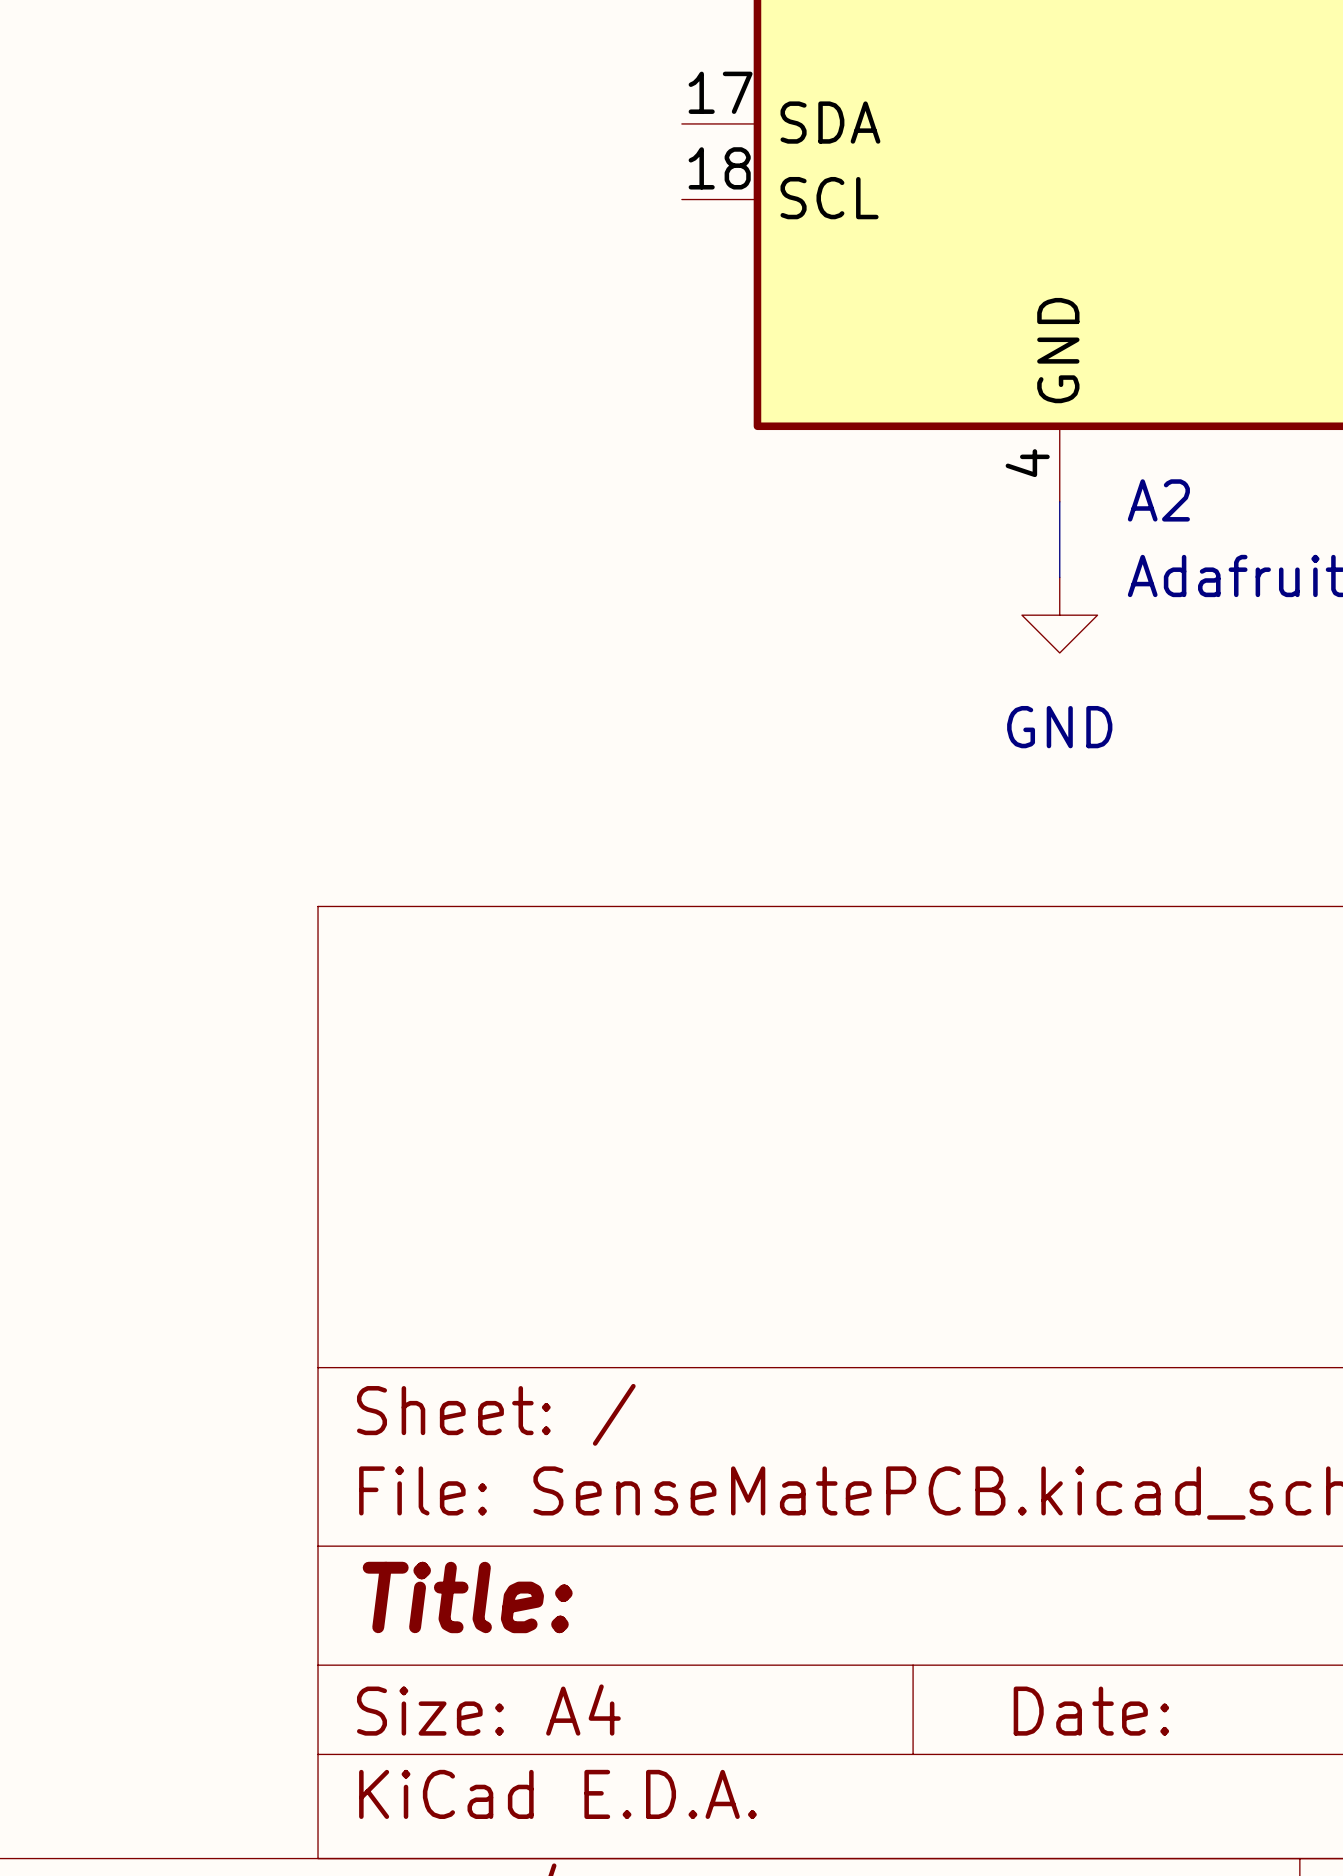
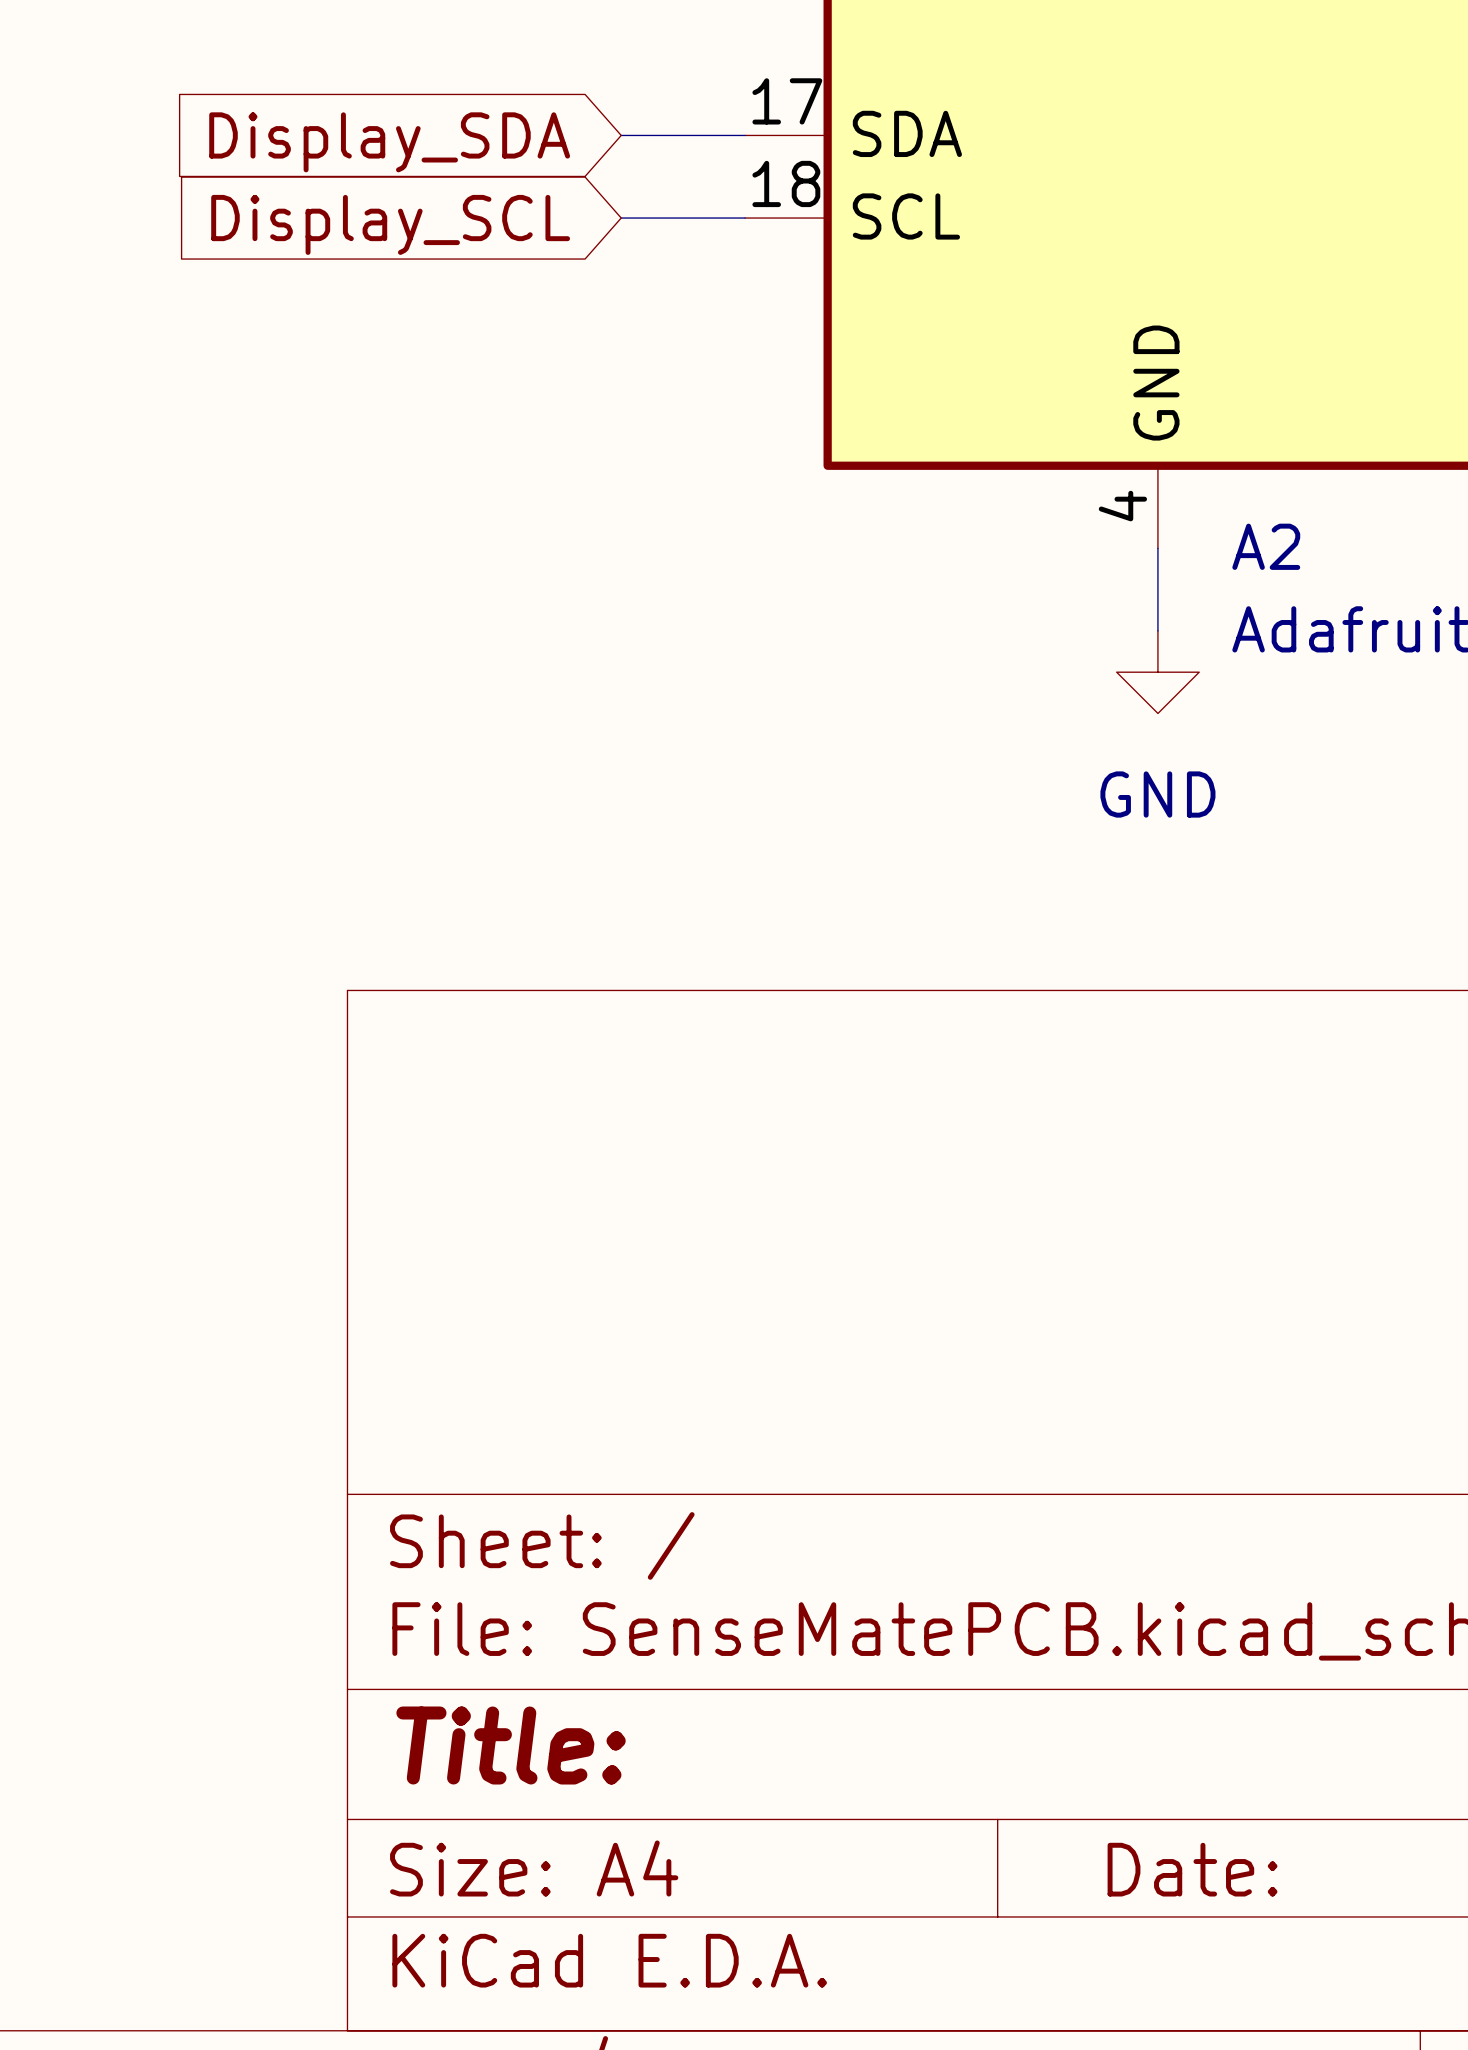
wire: none -> (621, 135) (745, 135)
global label: none -> Display_SDA (389, 142)
wire: none -> (621, 218) (745, 218)
global label: none -> Display_SCL (390, 224)

